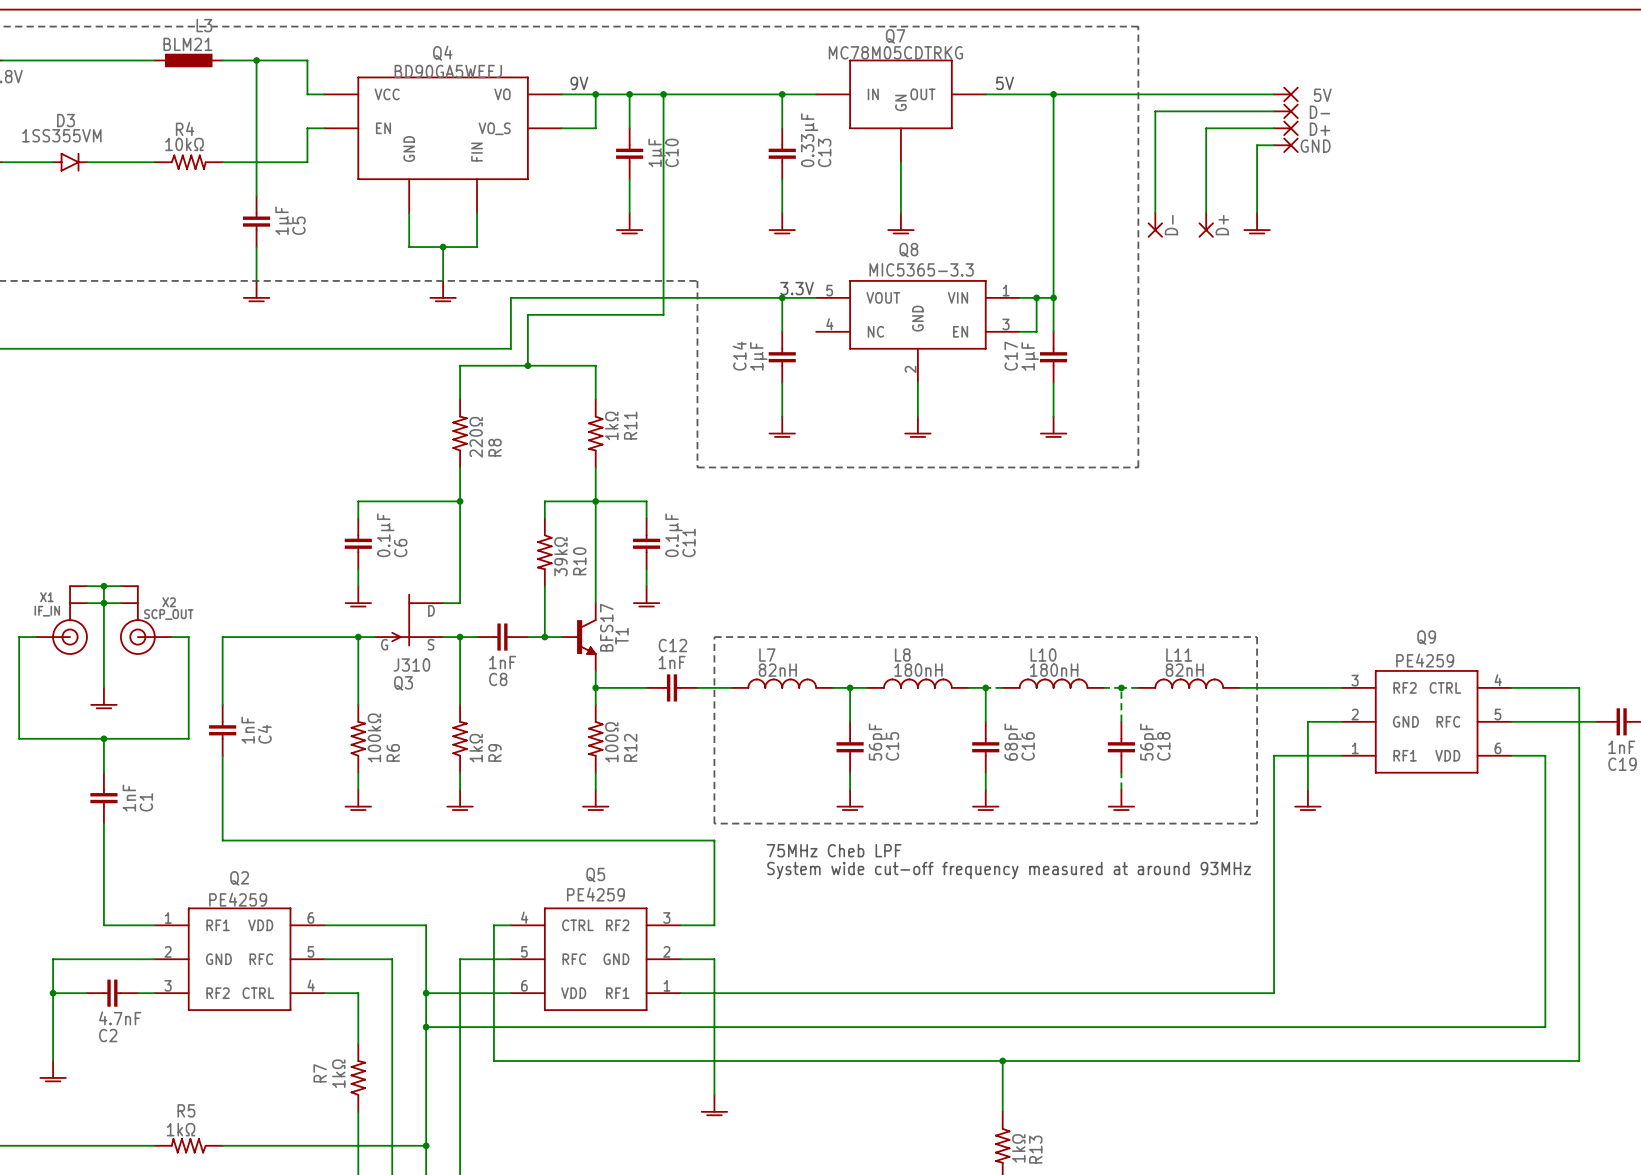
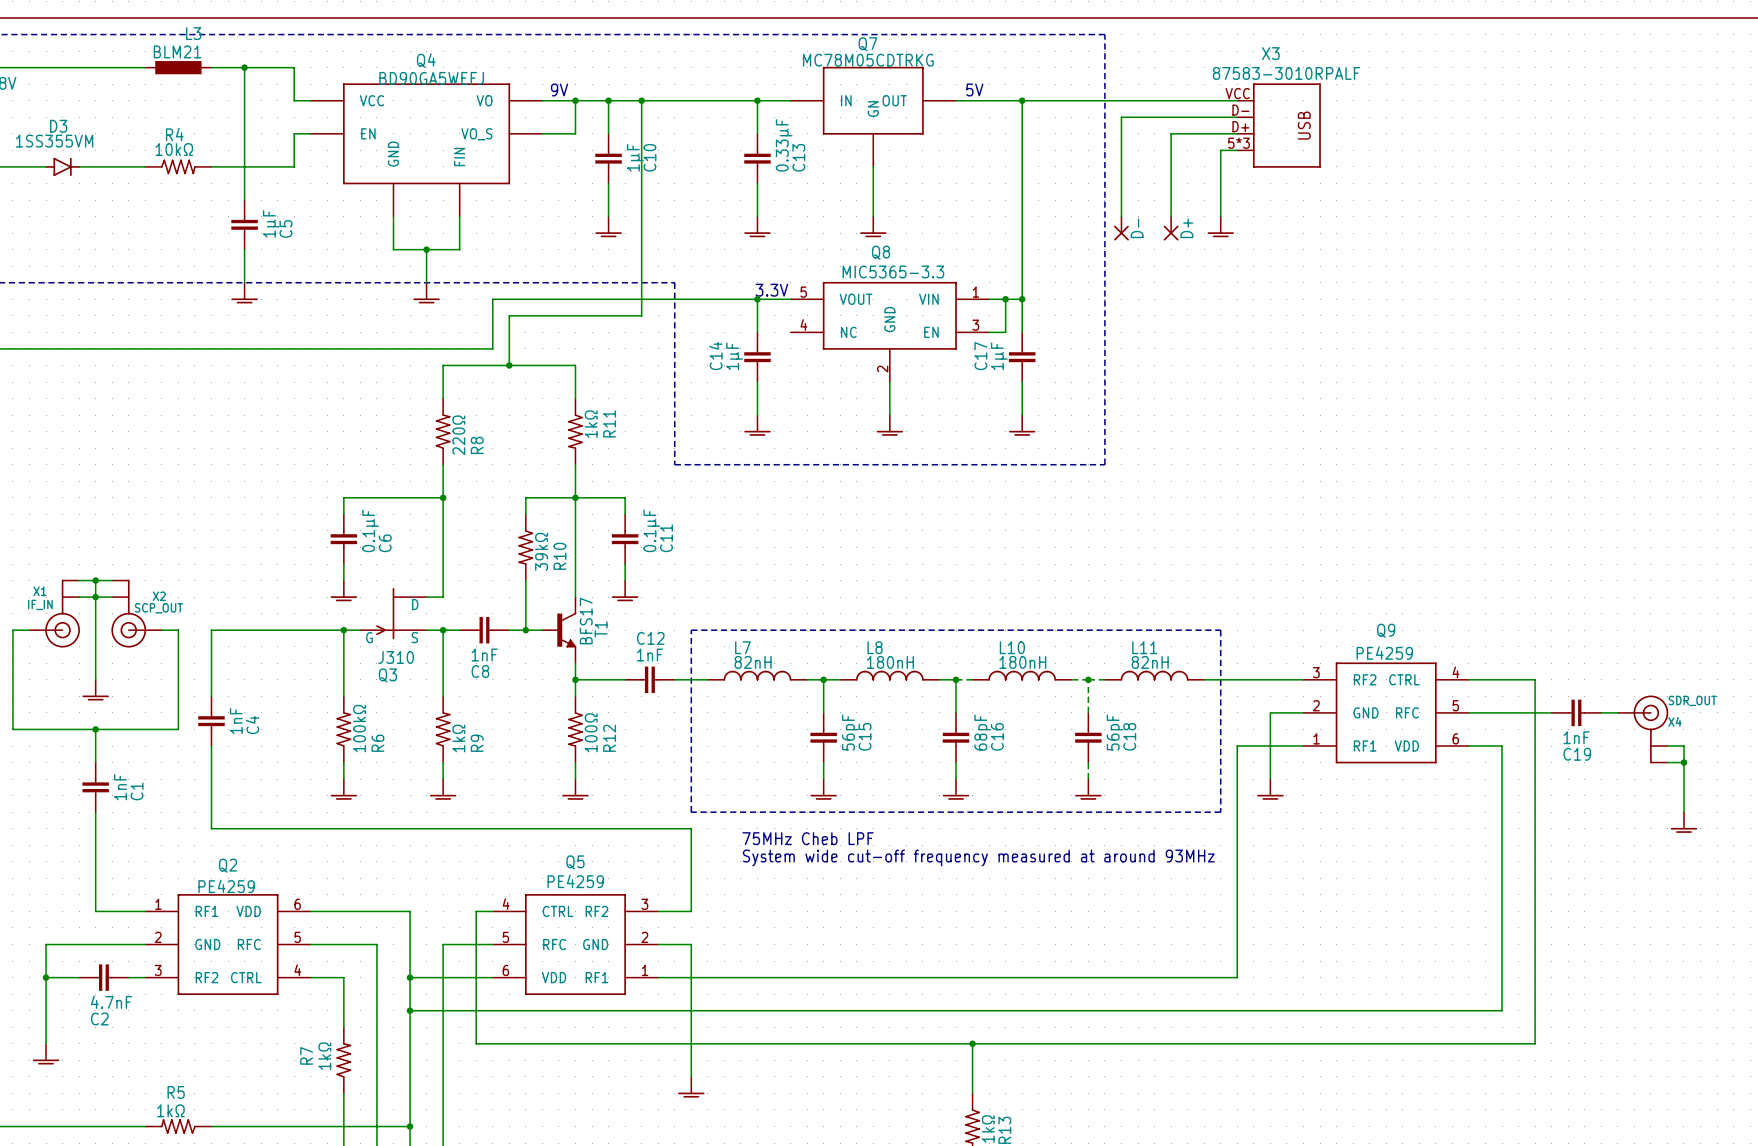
part: 5V (1286, 94) -> none
part: D- (1286, 111) -> none
X3: none -> 87583-3010RPALF (1279, 125)
part: D+ (1286, 128) -> none
part: GND (1286, 145) -> none

